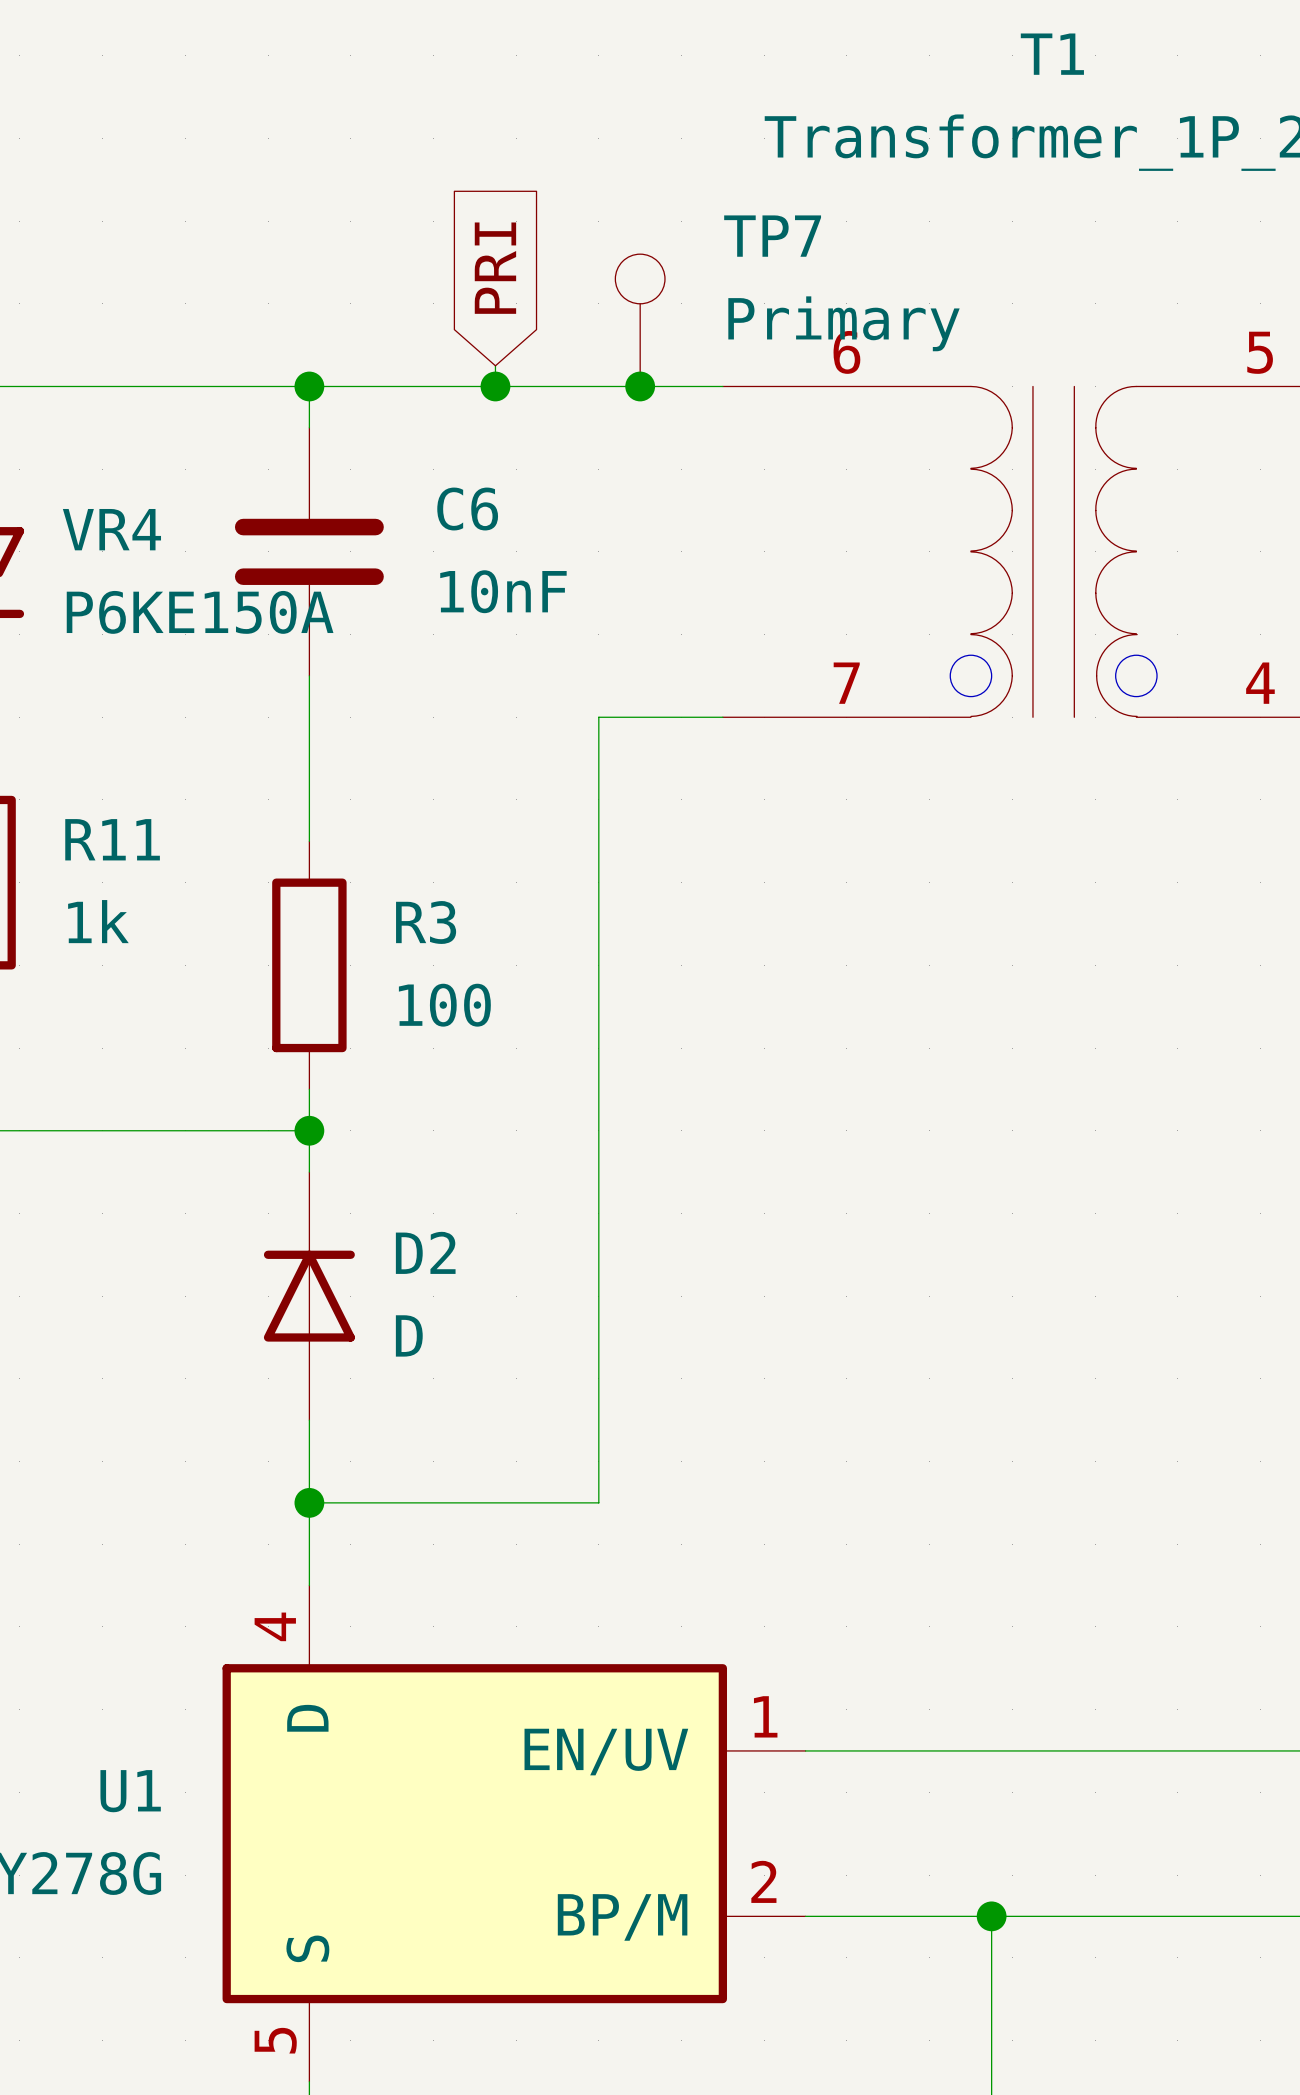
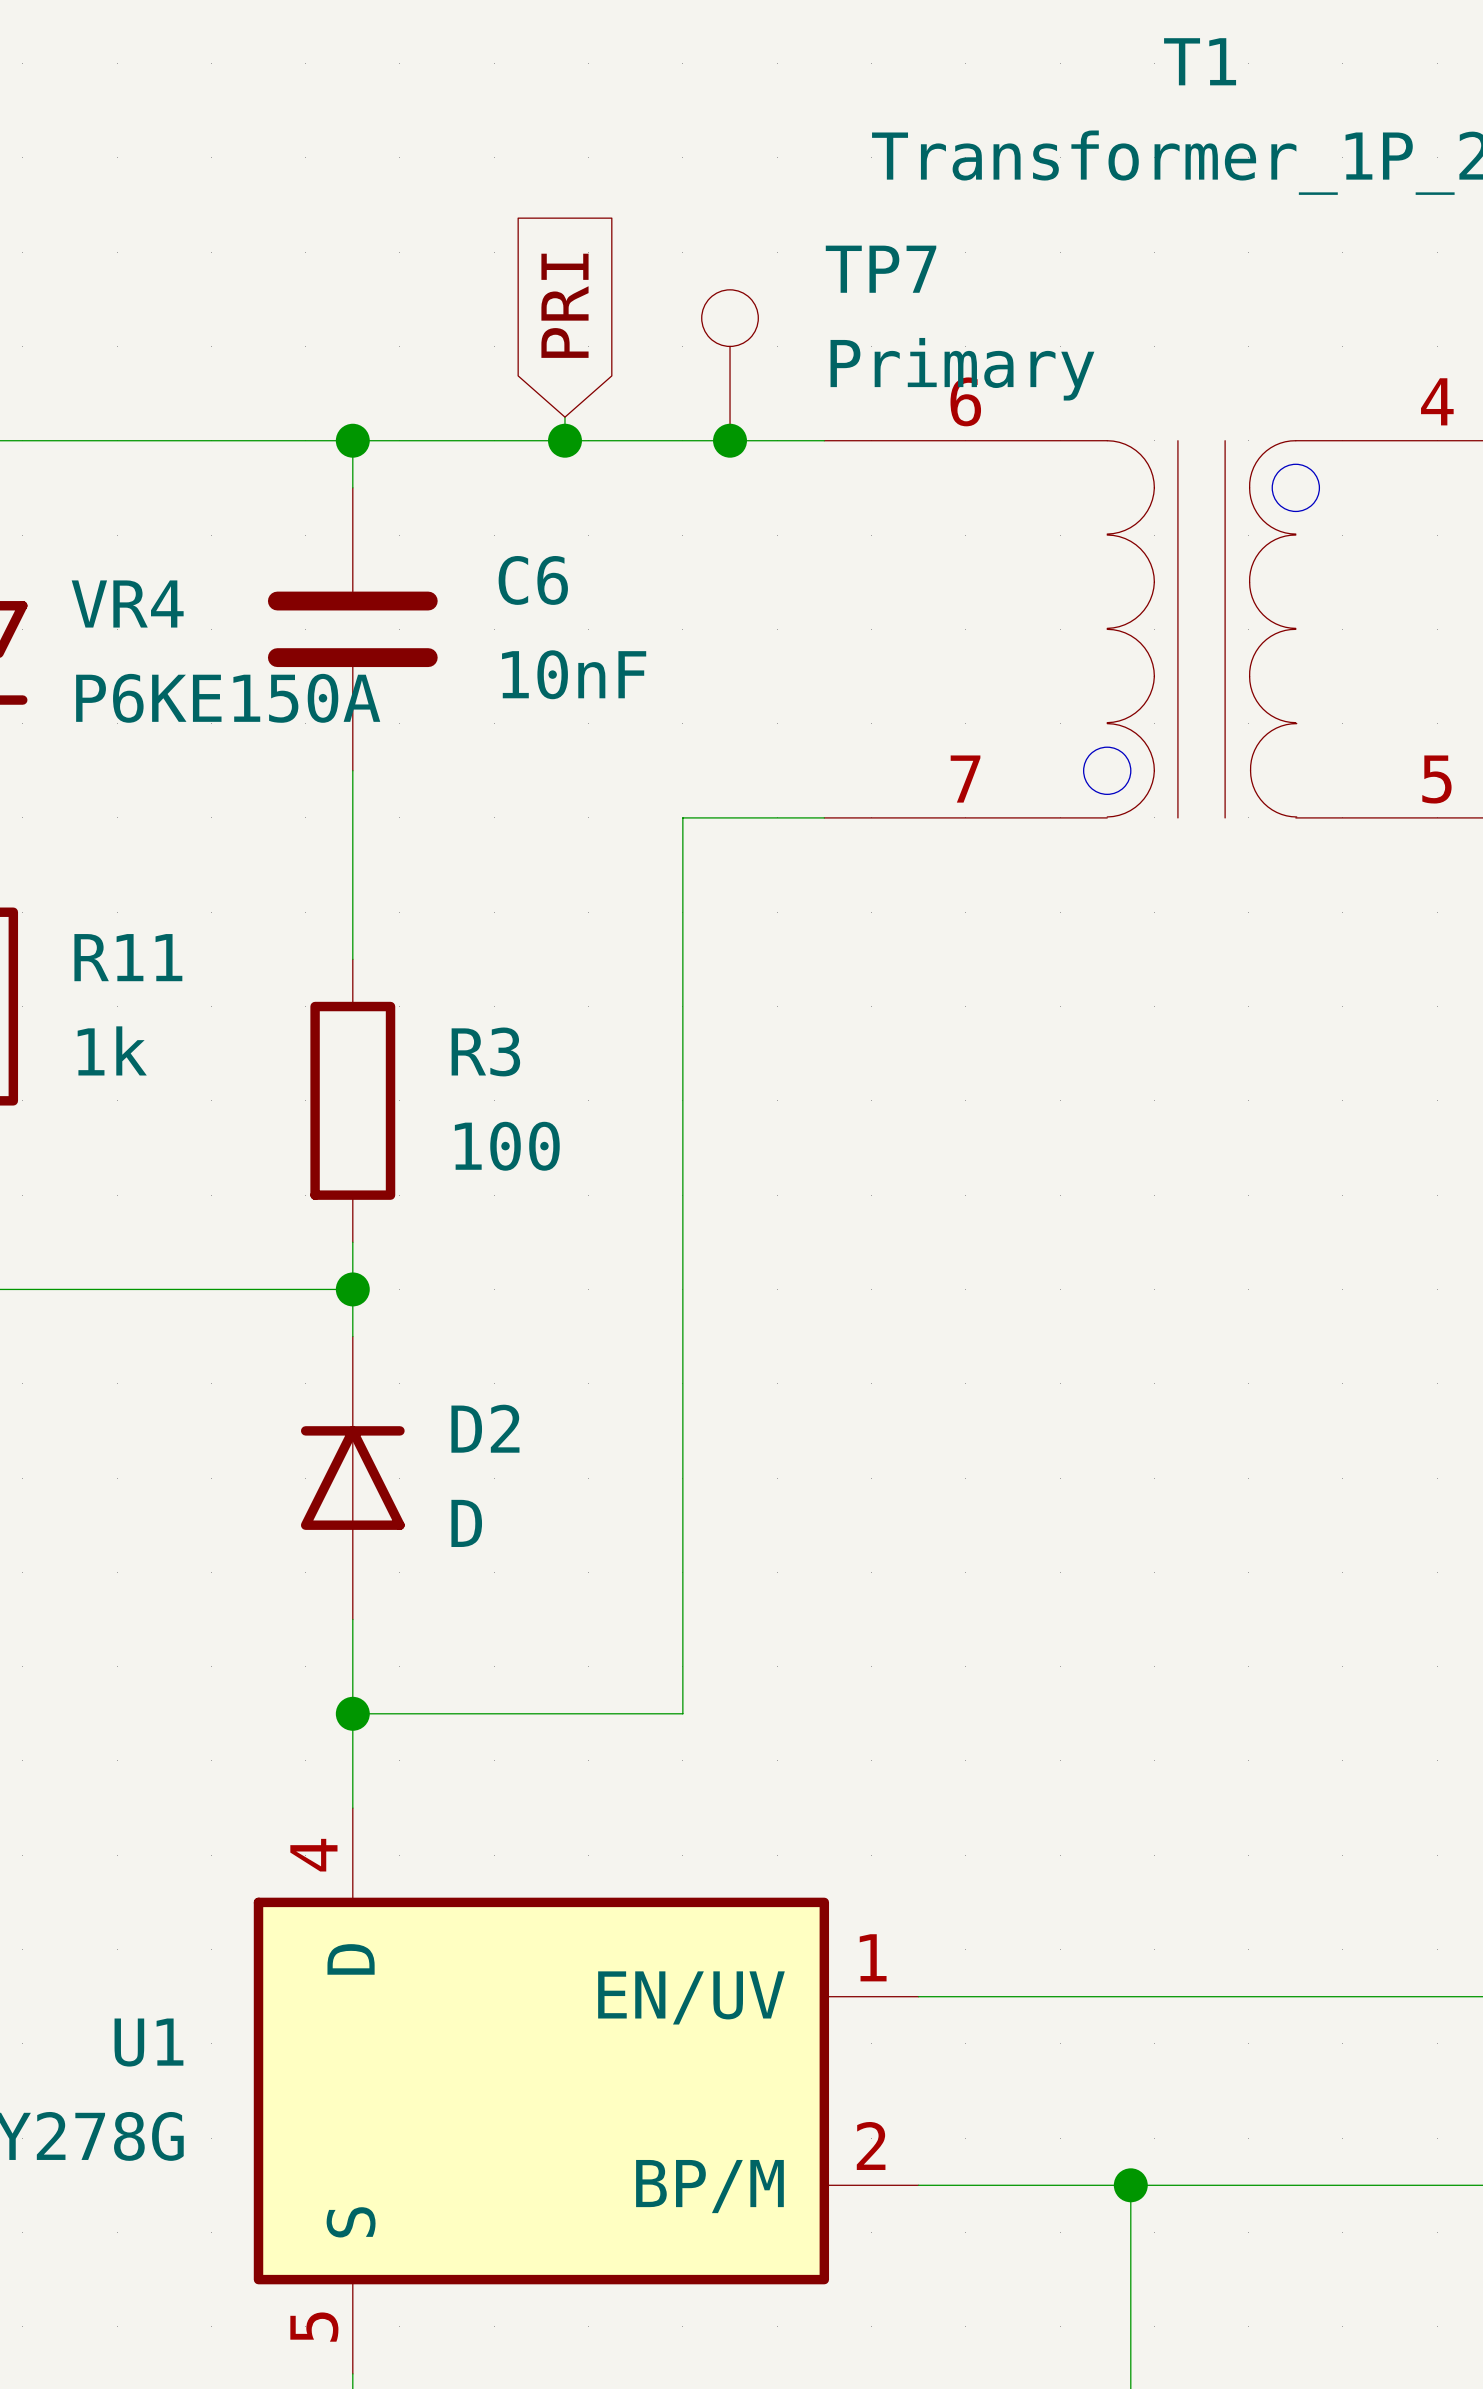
T1 pin number: 5 (1260, 352) -> 4 (1437, 401)
drawing position: (1136, 675) -> (1295, 487)
T1 pin number: 4 (1260, 683) -> 5 (1436, 779)

